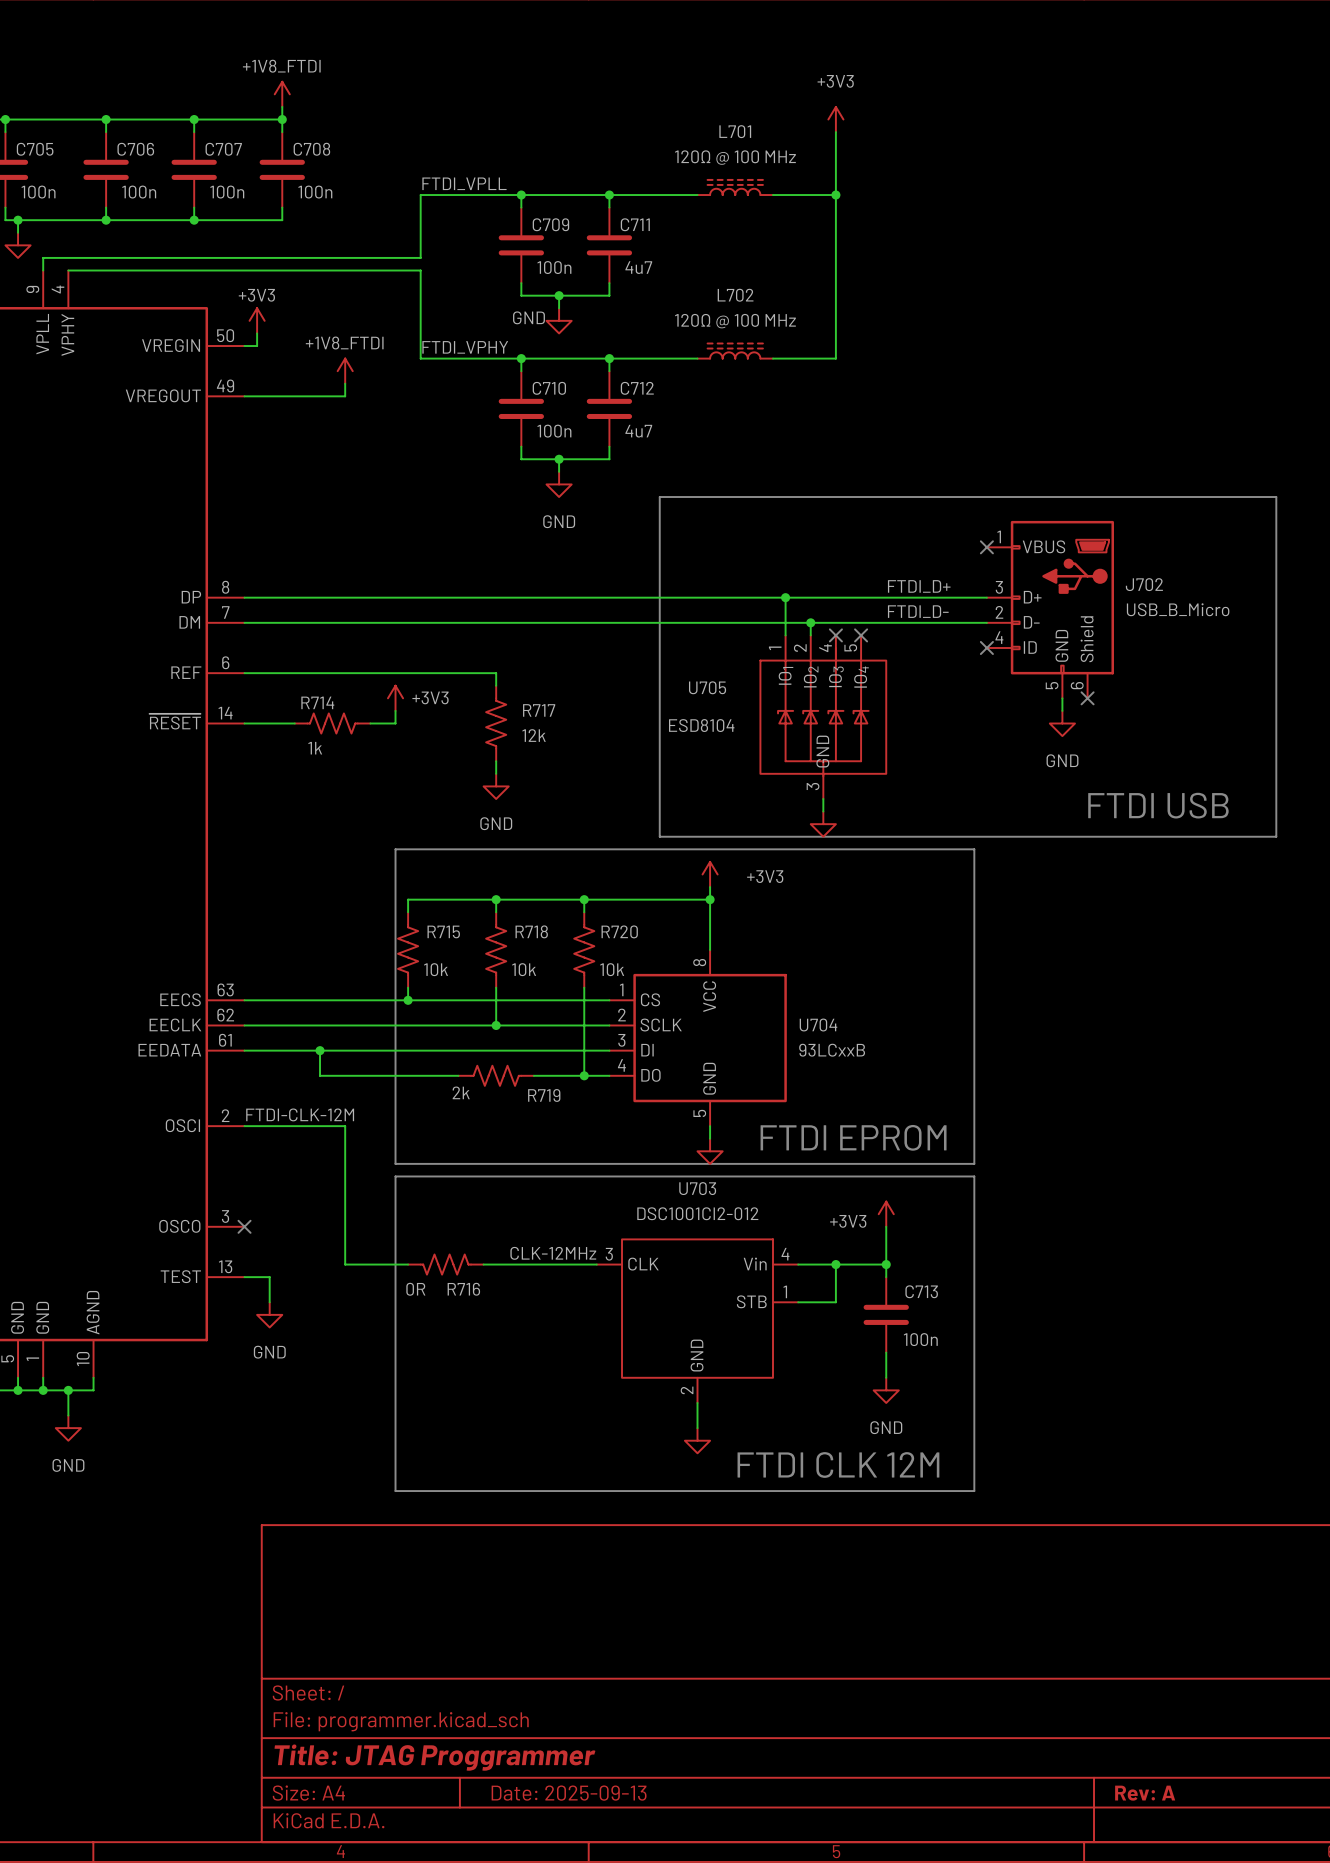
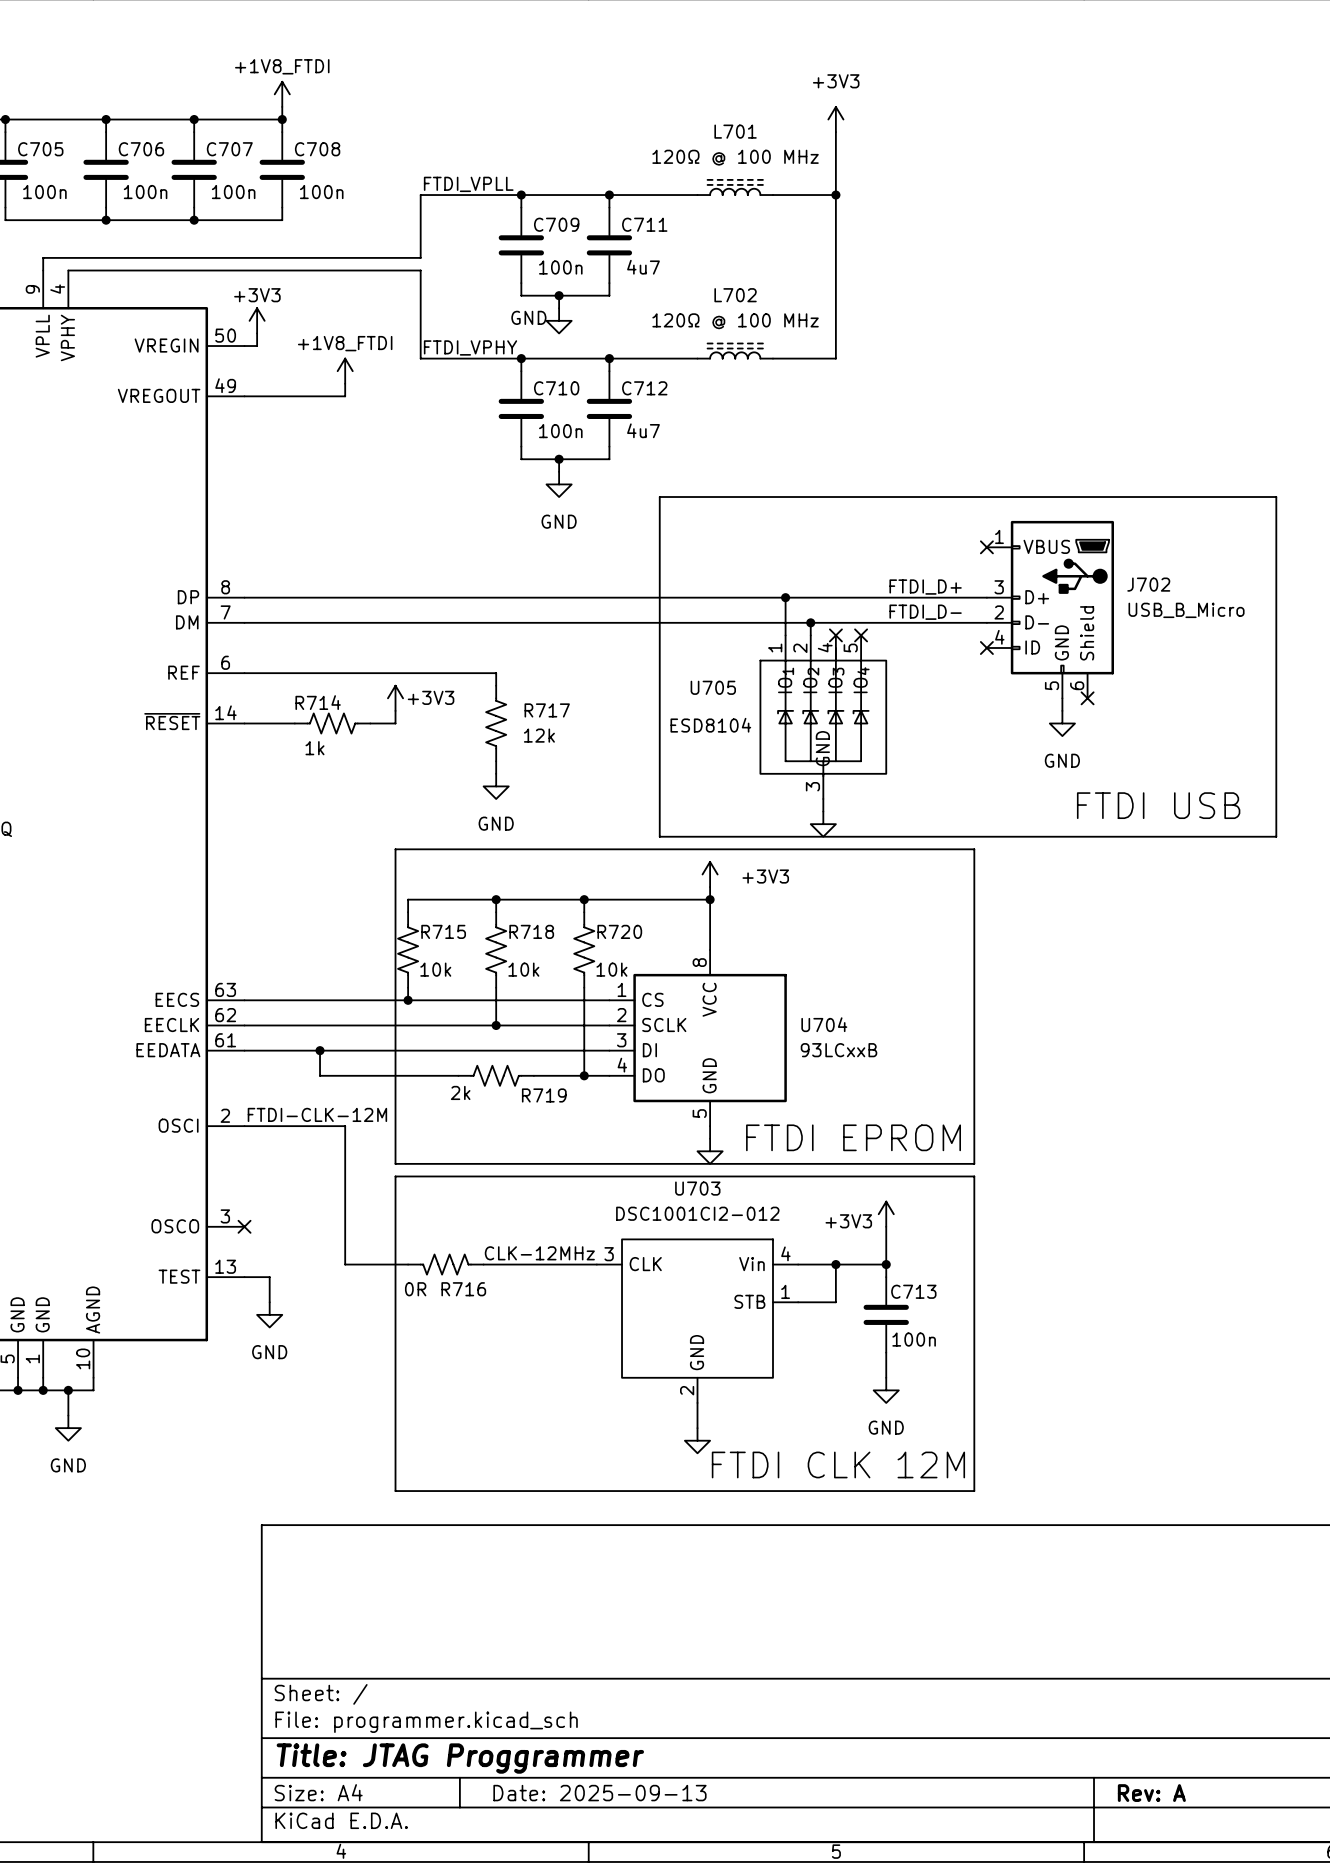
wire: (18, 220) (18, 232) -> none
junction: (18, 220) -> none
power symbol: (18, 245) -> none

